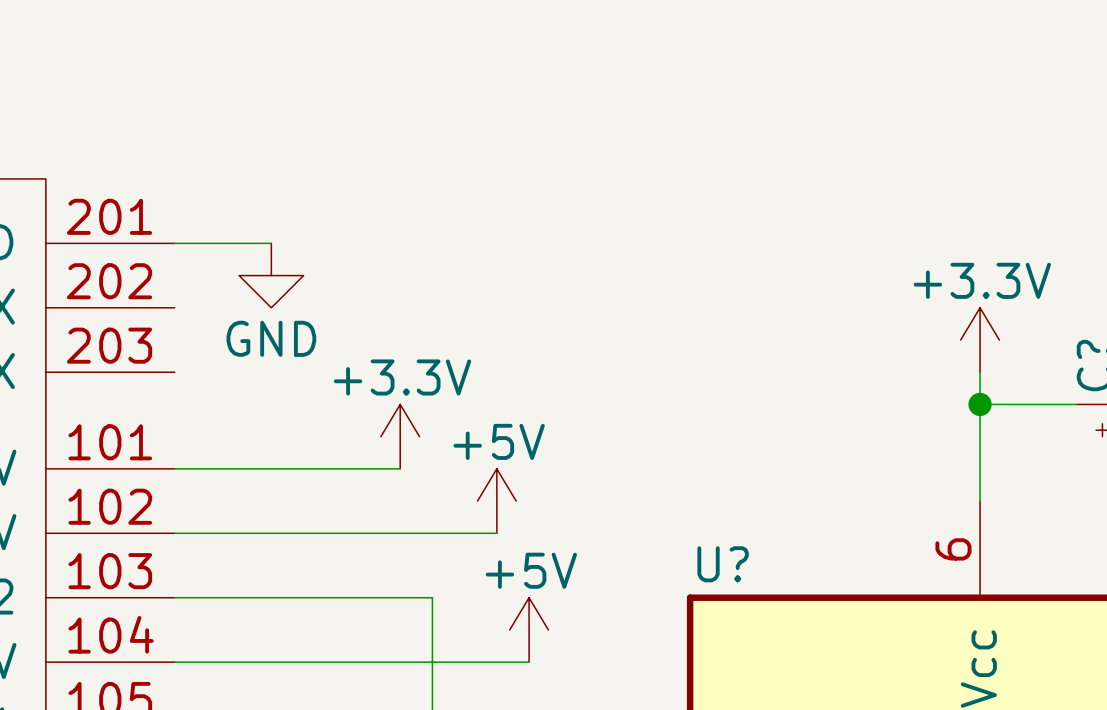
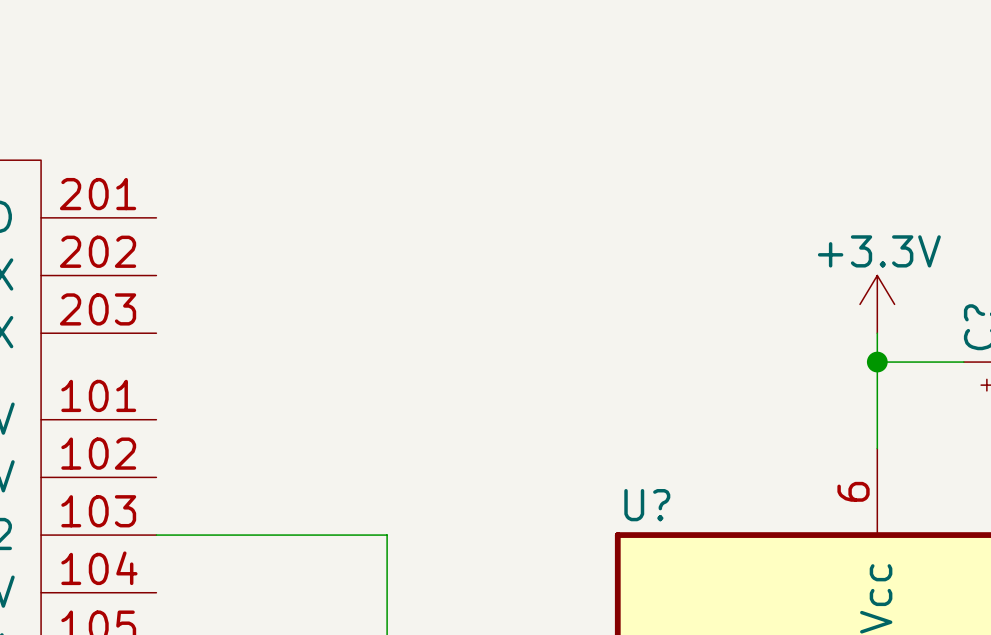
wire: (174, 243) (271, 243) -> none
power symbol: GND (271, 275) -> none
power symbol: +3.3V (400, 436) -> none
wire: (174, 468) (400, 468) -> none
power symbol: +5V (496, 501) -> none
wire: (174, 533) (496, 533) -> none
power symbol: +5V (529, 629) -> none
wire: (174, 662) (529, 662) -> none

